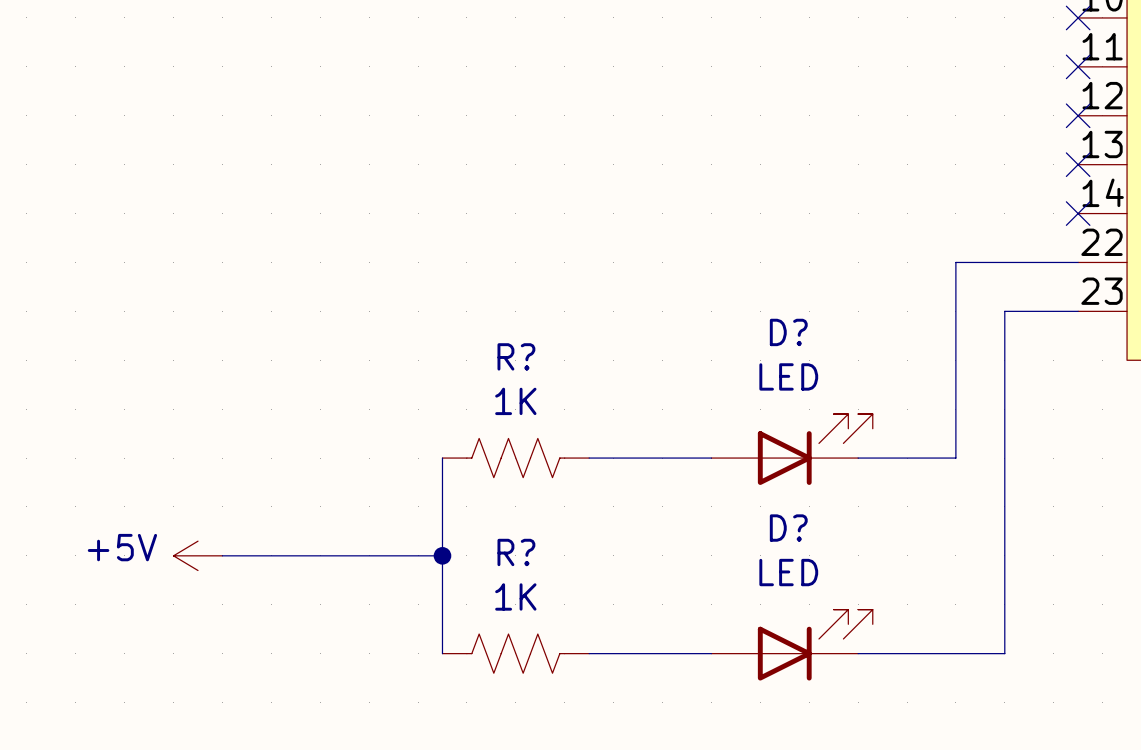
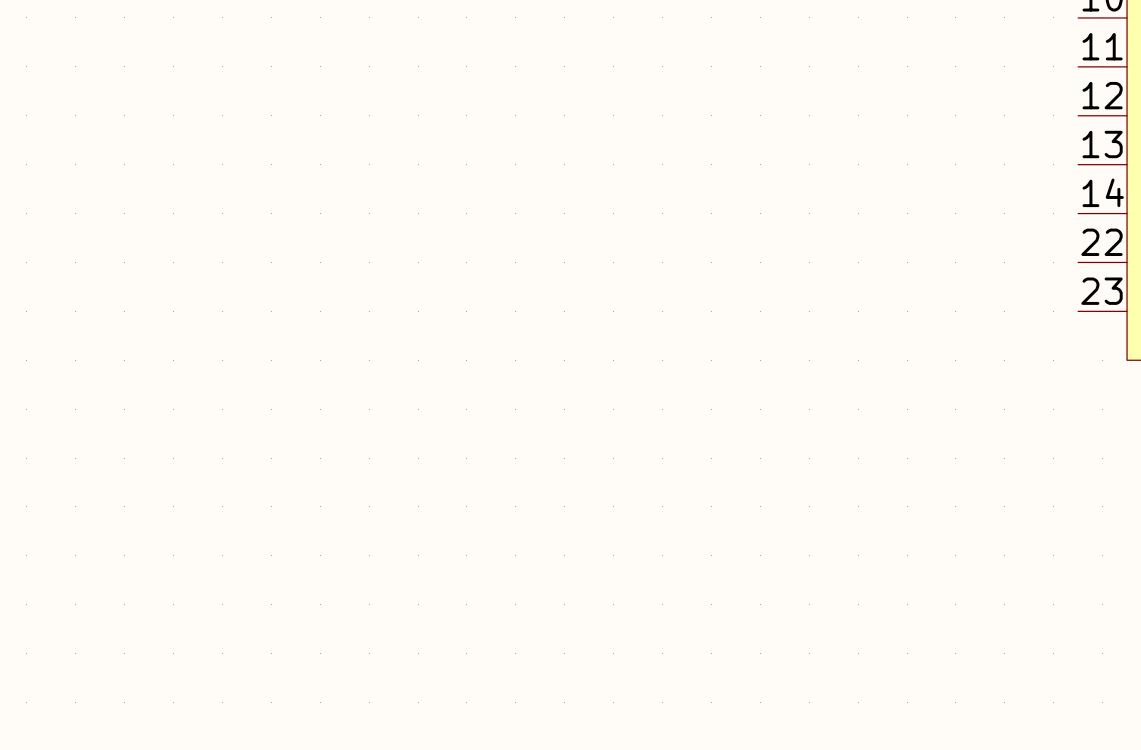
no-connect mark: (1078, 17) -> none
no-connect mark: (1078, 66) -> none
no-connect mark: (1078, 115) -> none
no-connect mark: (1078, 164) -> none
no-connect mark: (1078, 213) -> none
wire: (1078, 262) (955, 262) (955, 458) (858, 458) -> none
wire: (1078, 311) (1004, 311) (1004, 653) (858, 653) -> none
D?: LED (792, 449) -> none
wire: (442, 458) (442, 653) -> none
R?: 1K (515, 458) -> none
wire: (589, 458) (711, 458) -> none
power symbol: +5V (198, 555) -> none
wire: (222, 555) (442, 555) -> none
junction: (442, 555) -> none
D?: LED (792, 645) -> none
R?: 1K (515, 653) -> none
wire: (589, 653) (711, 653) -> none

